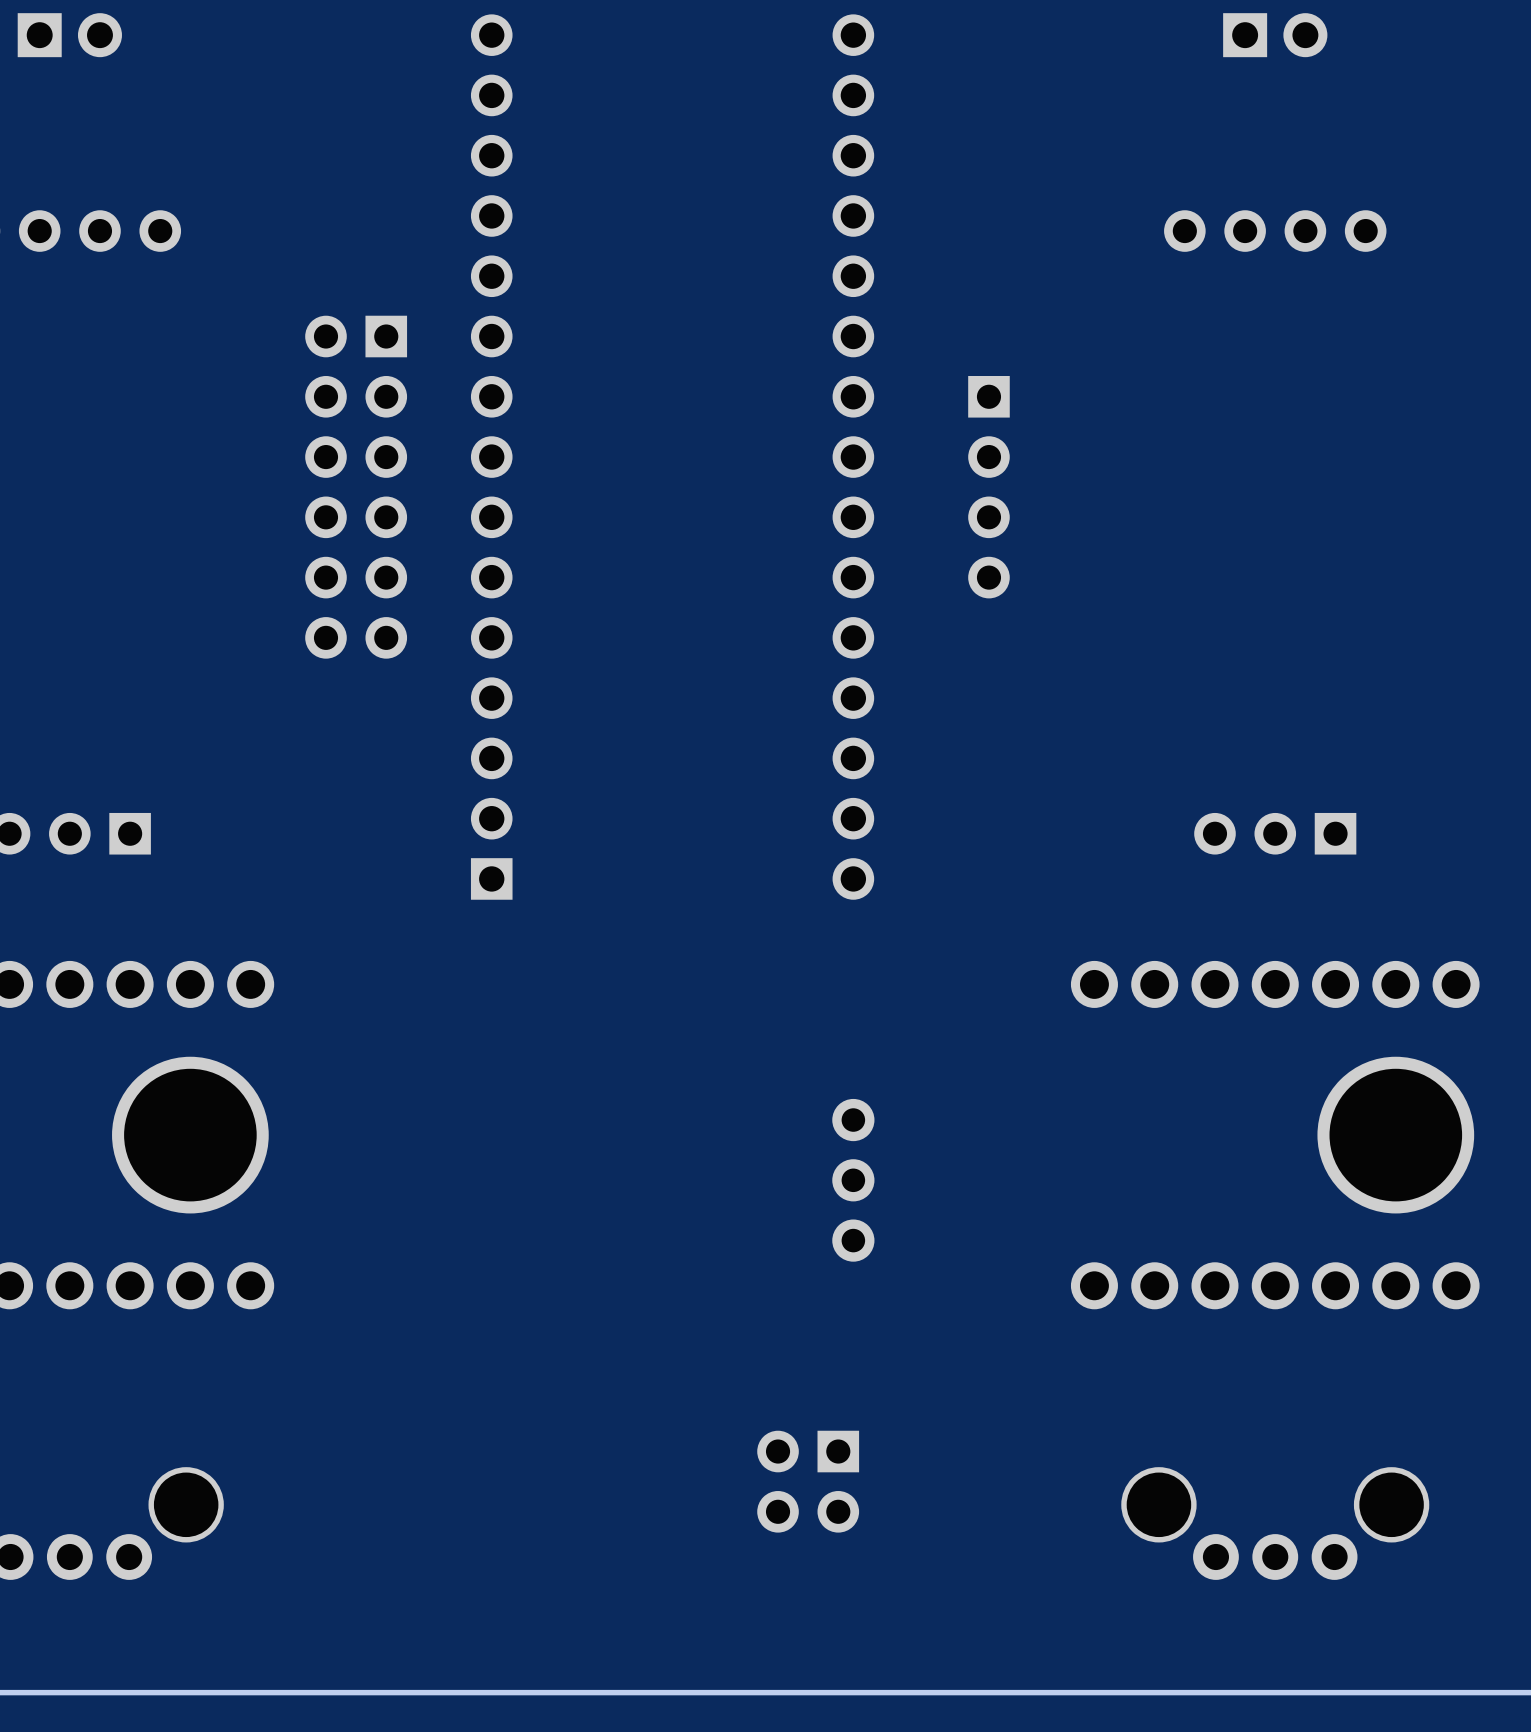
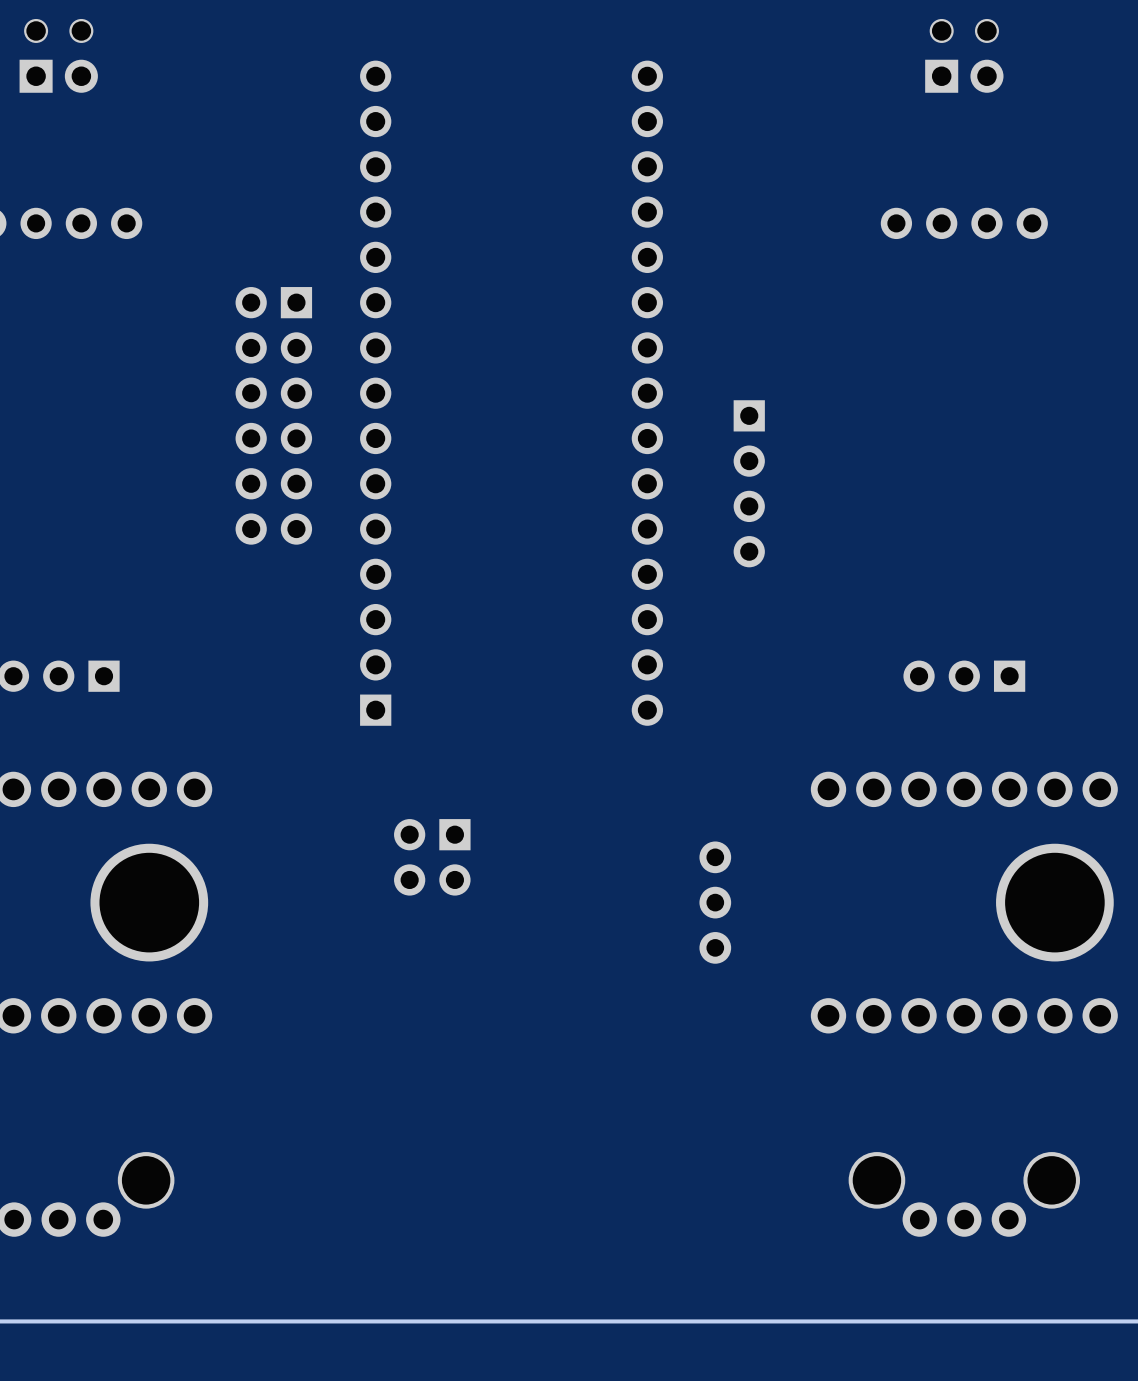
part position: (988, 487) -> (749, 483)
part position: (853, 1180) -> (715, 902)
part position: (808, 1481) -> (432, 857)

